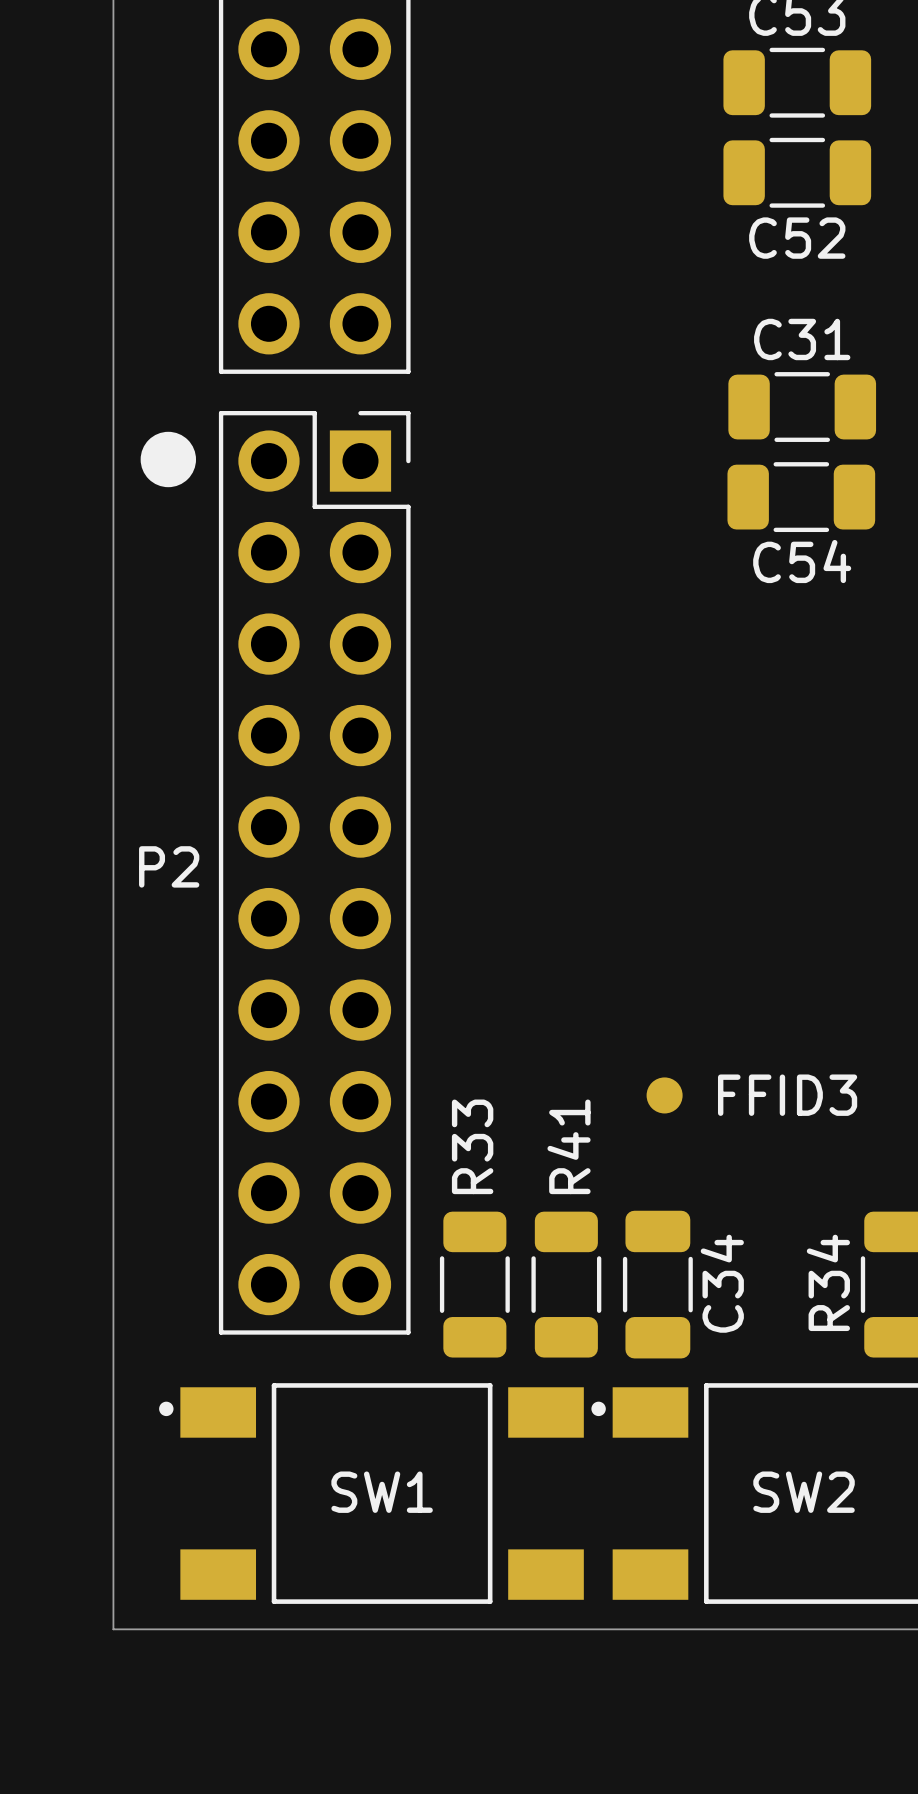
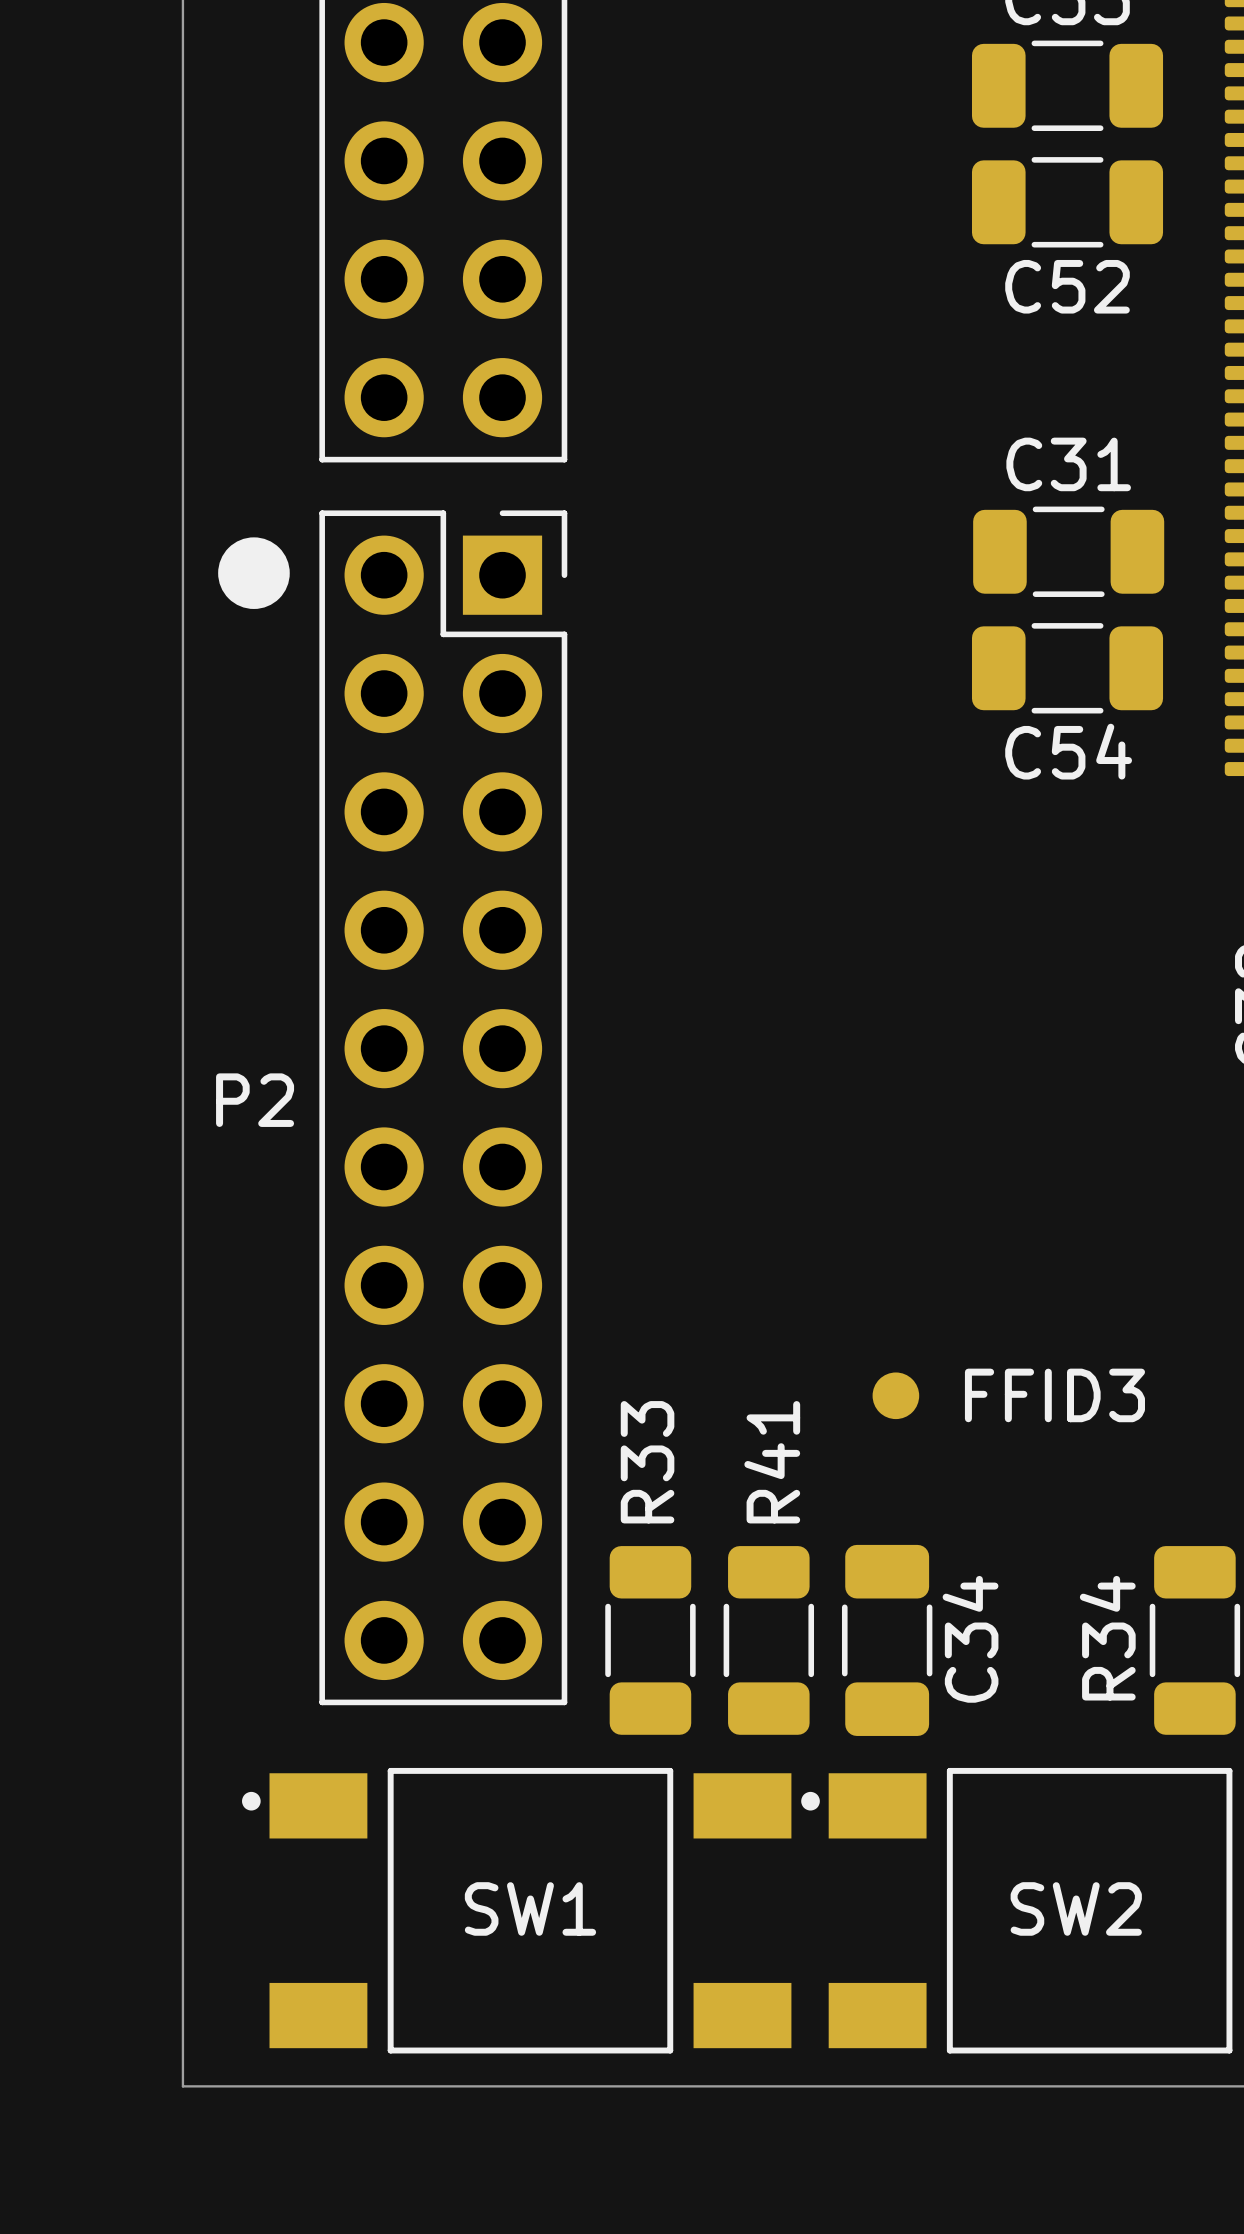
C31 position: (802, 407) -> (1068, 551)
C54 position: (801, 497) -> (1067, 668)

